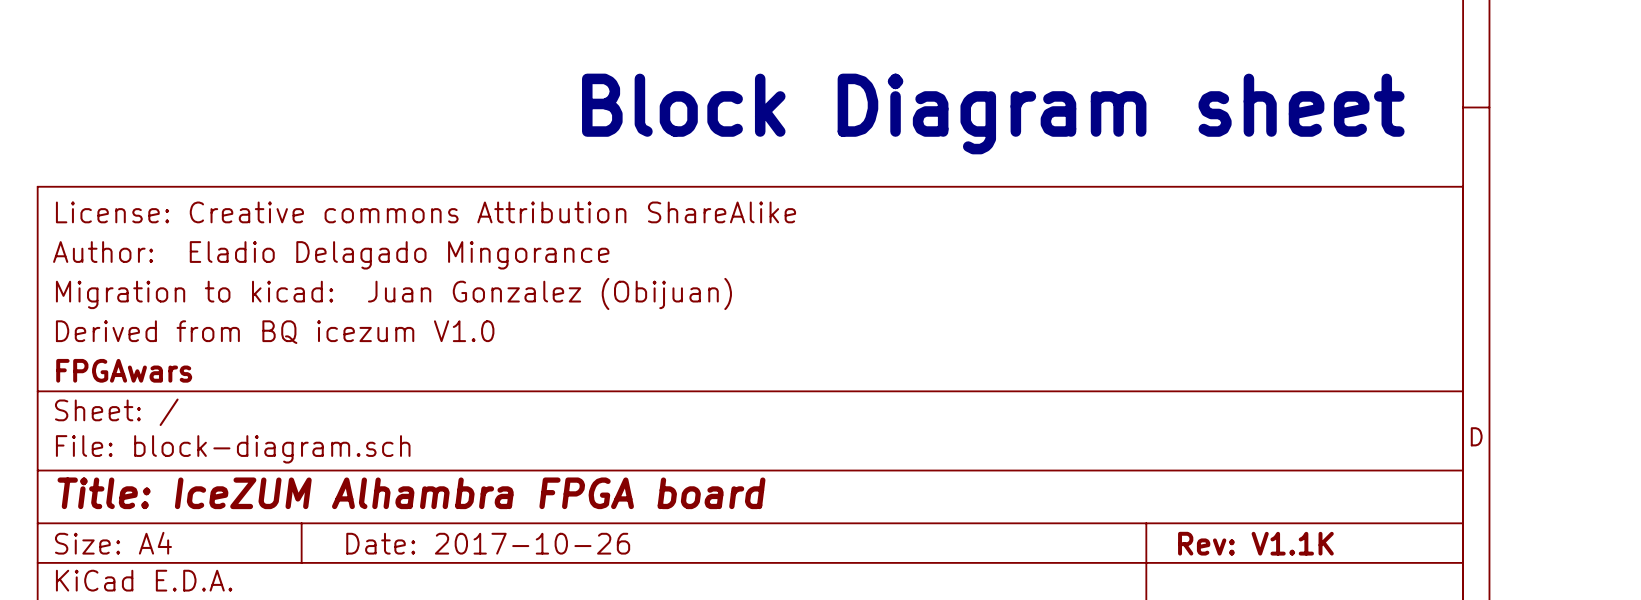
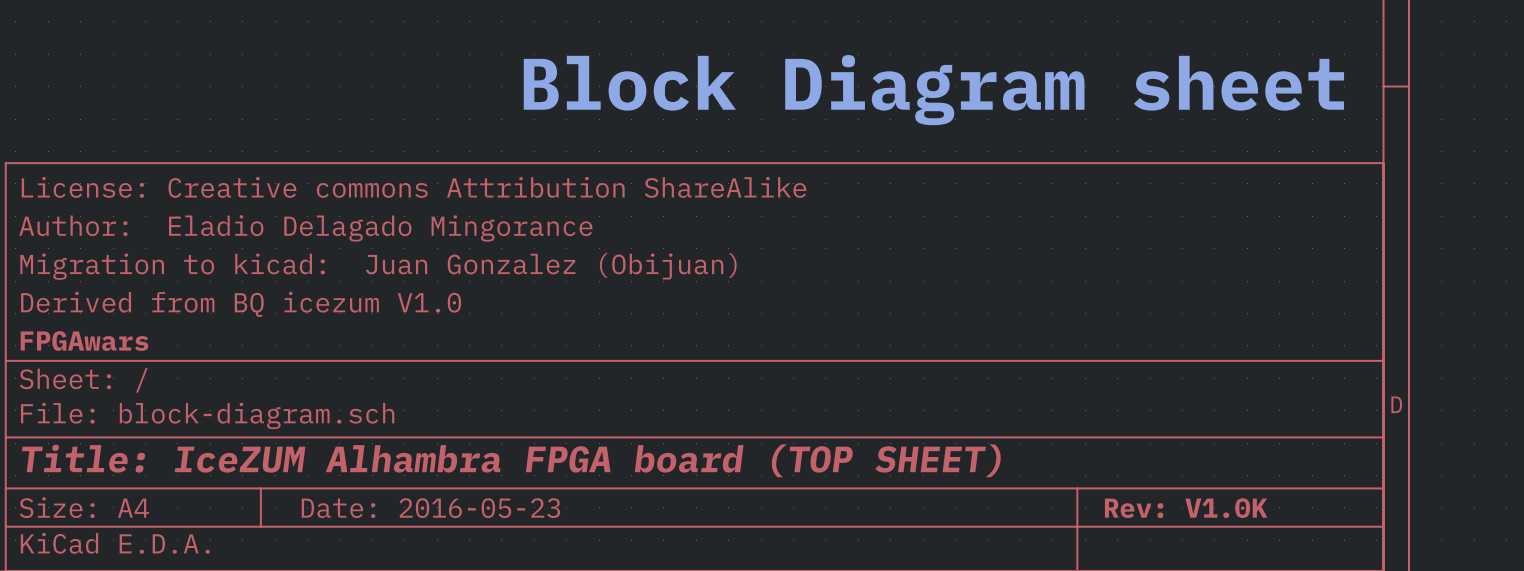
title block: Title: IceZUM Alhambra FPGA board (411, 493) -> Title: IceZUM Alhambra FPGA board (TOP SHEET) (511, 460)
title block: Date: 2017-10-26 (488, 543) -> Date: 2016-05-23 (430, 508)
title block: Rev: V1.1K (1255, 543) -> Rev: V1.0K (1186, 508)

